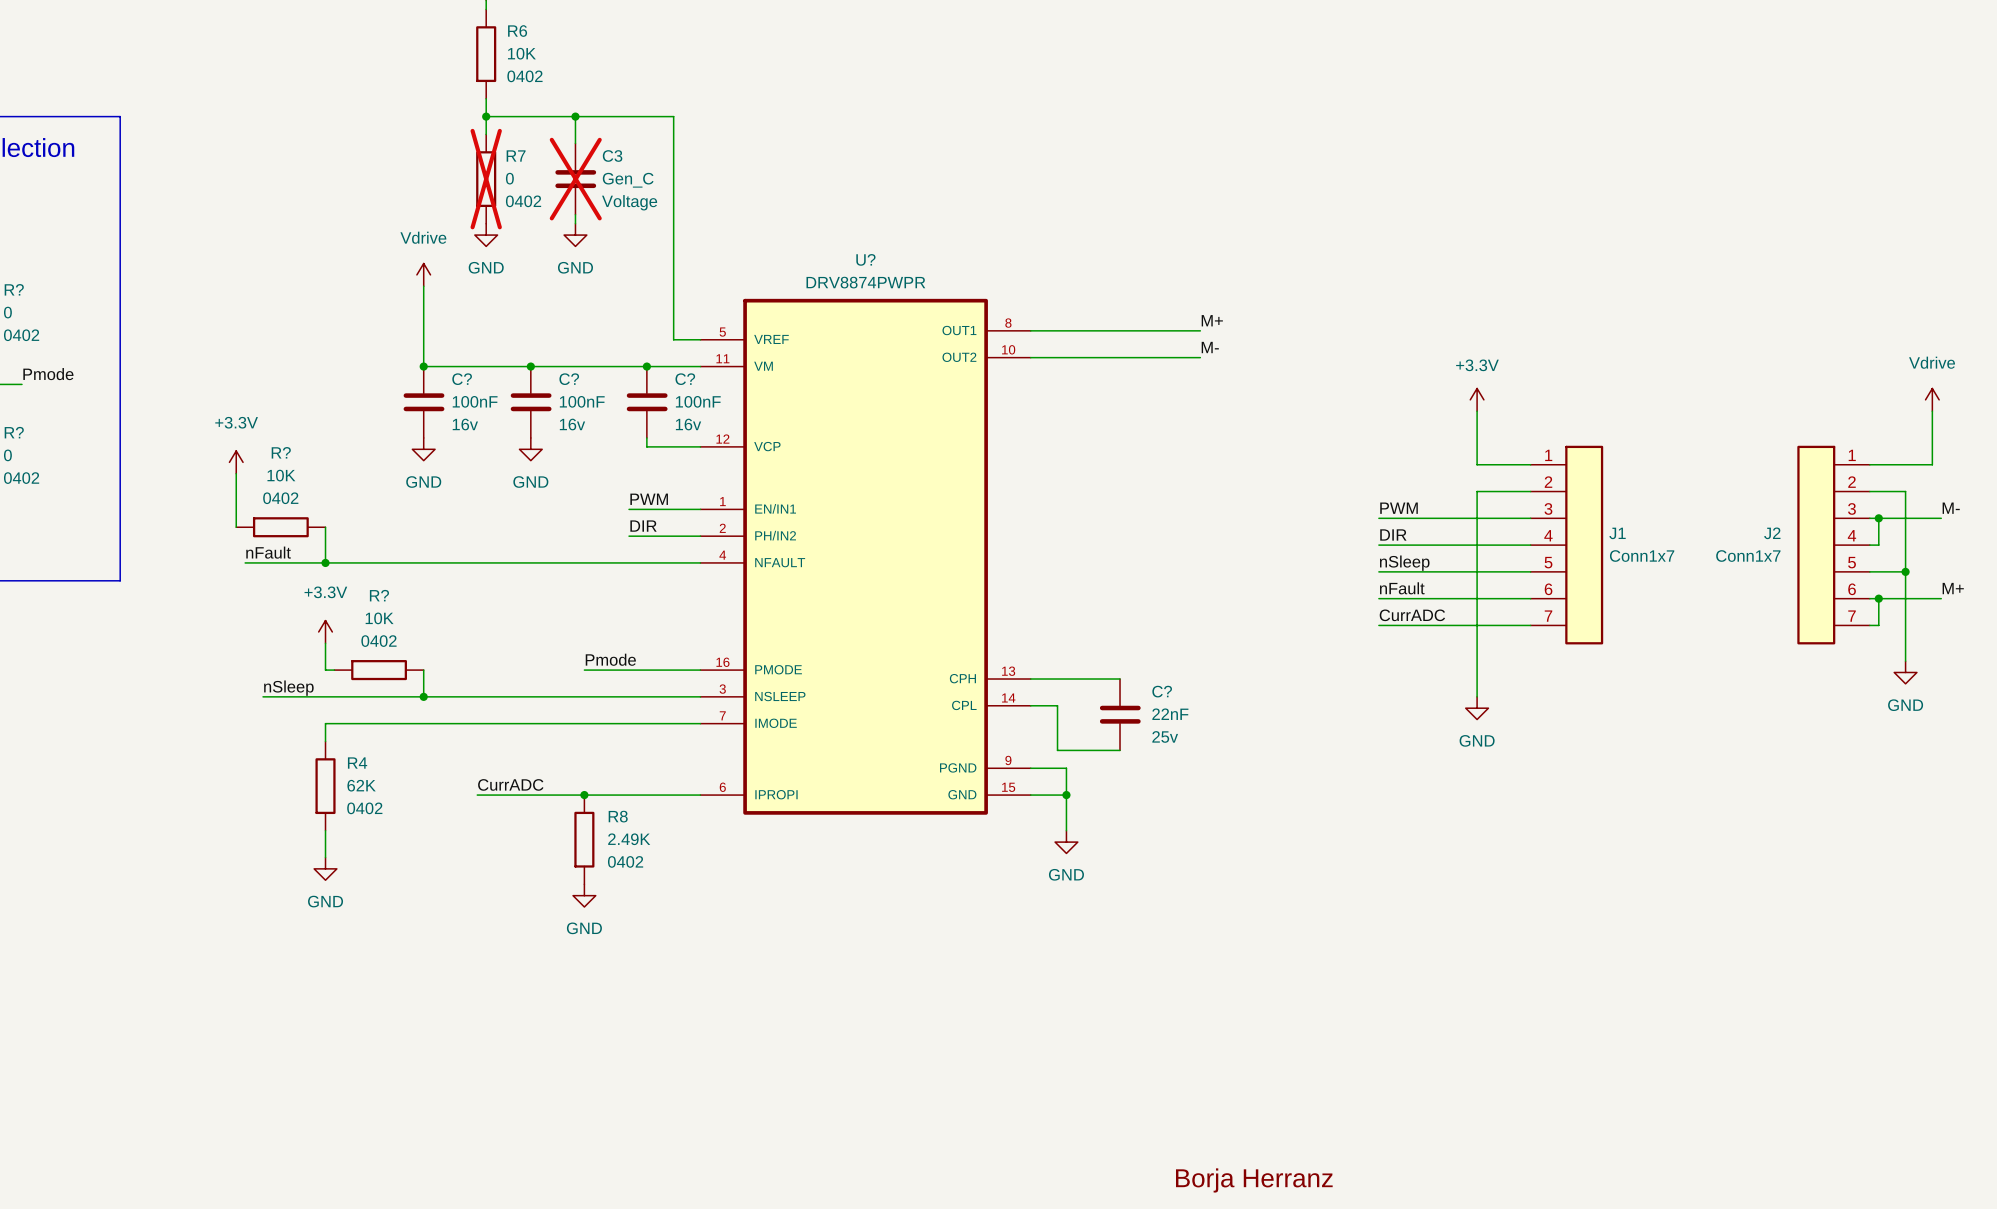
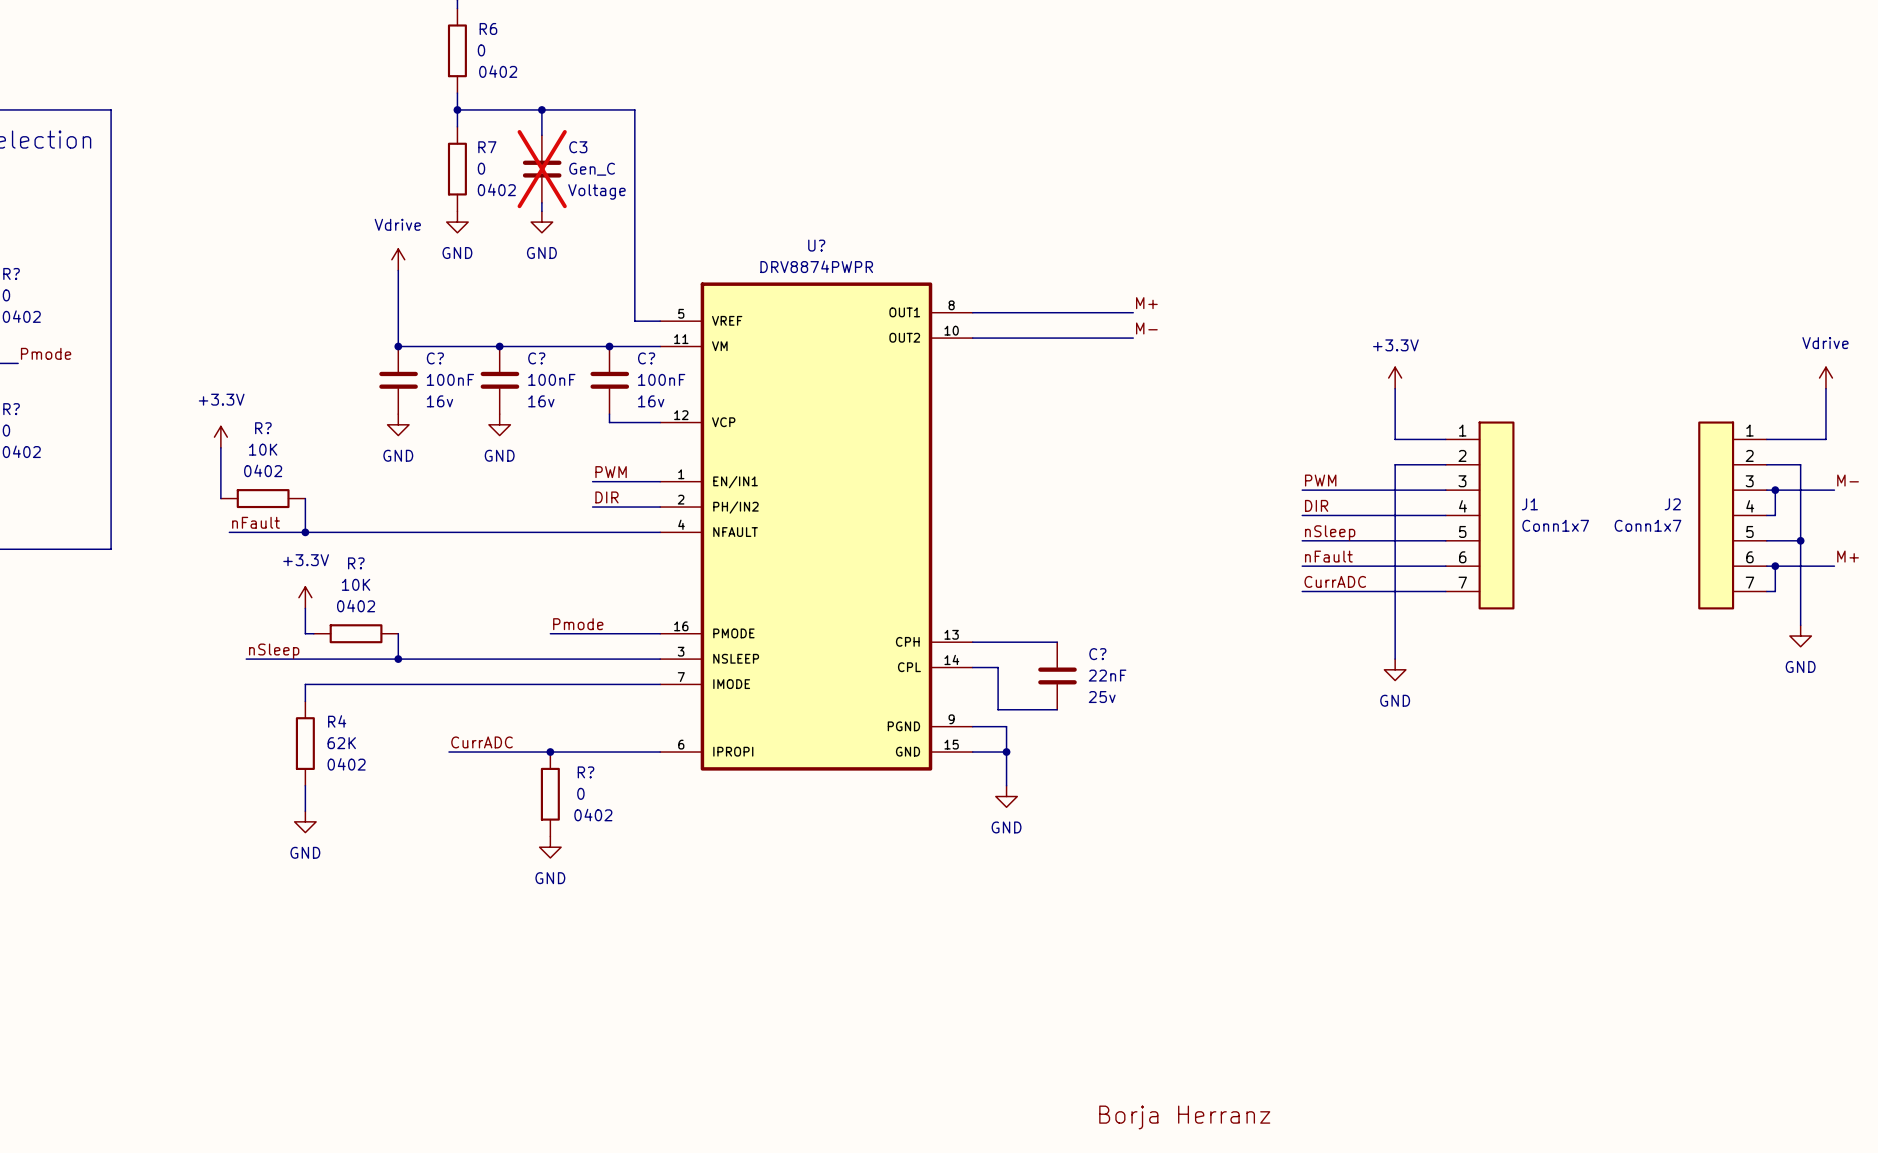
R6 value: 10K (521, 53) -> 0 (481, 50)
R7 do-not-place cross: (486, 179) -> none
R8 name: R8 (618, 816) -> R? (586, 772)
R8 value: 2.49K (629, 839) -> 0 (580, 793)

